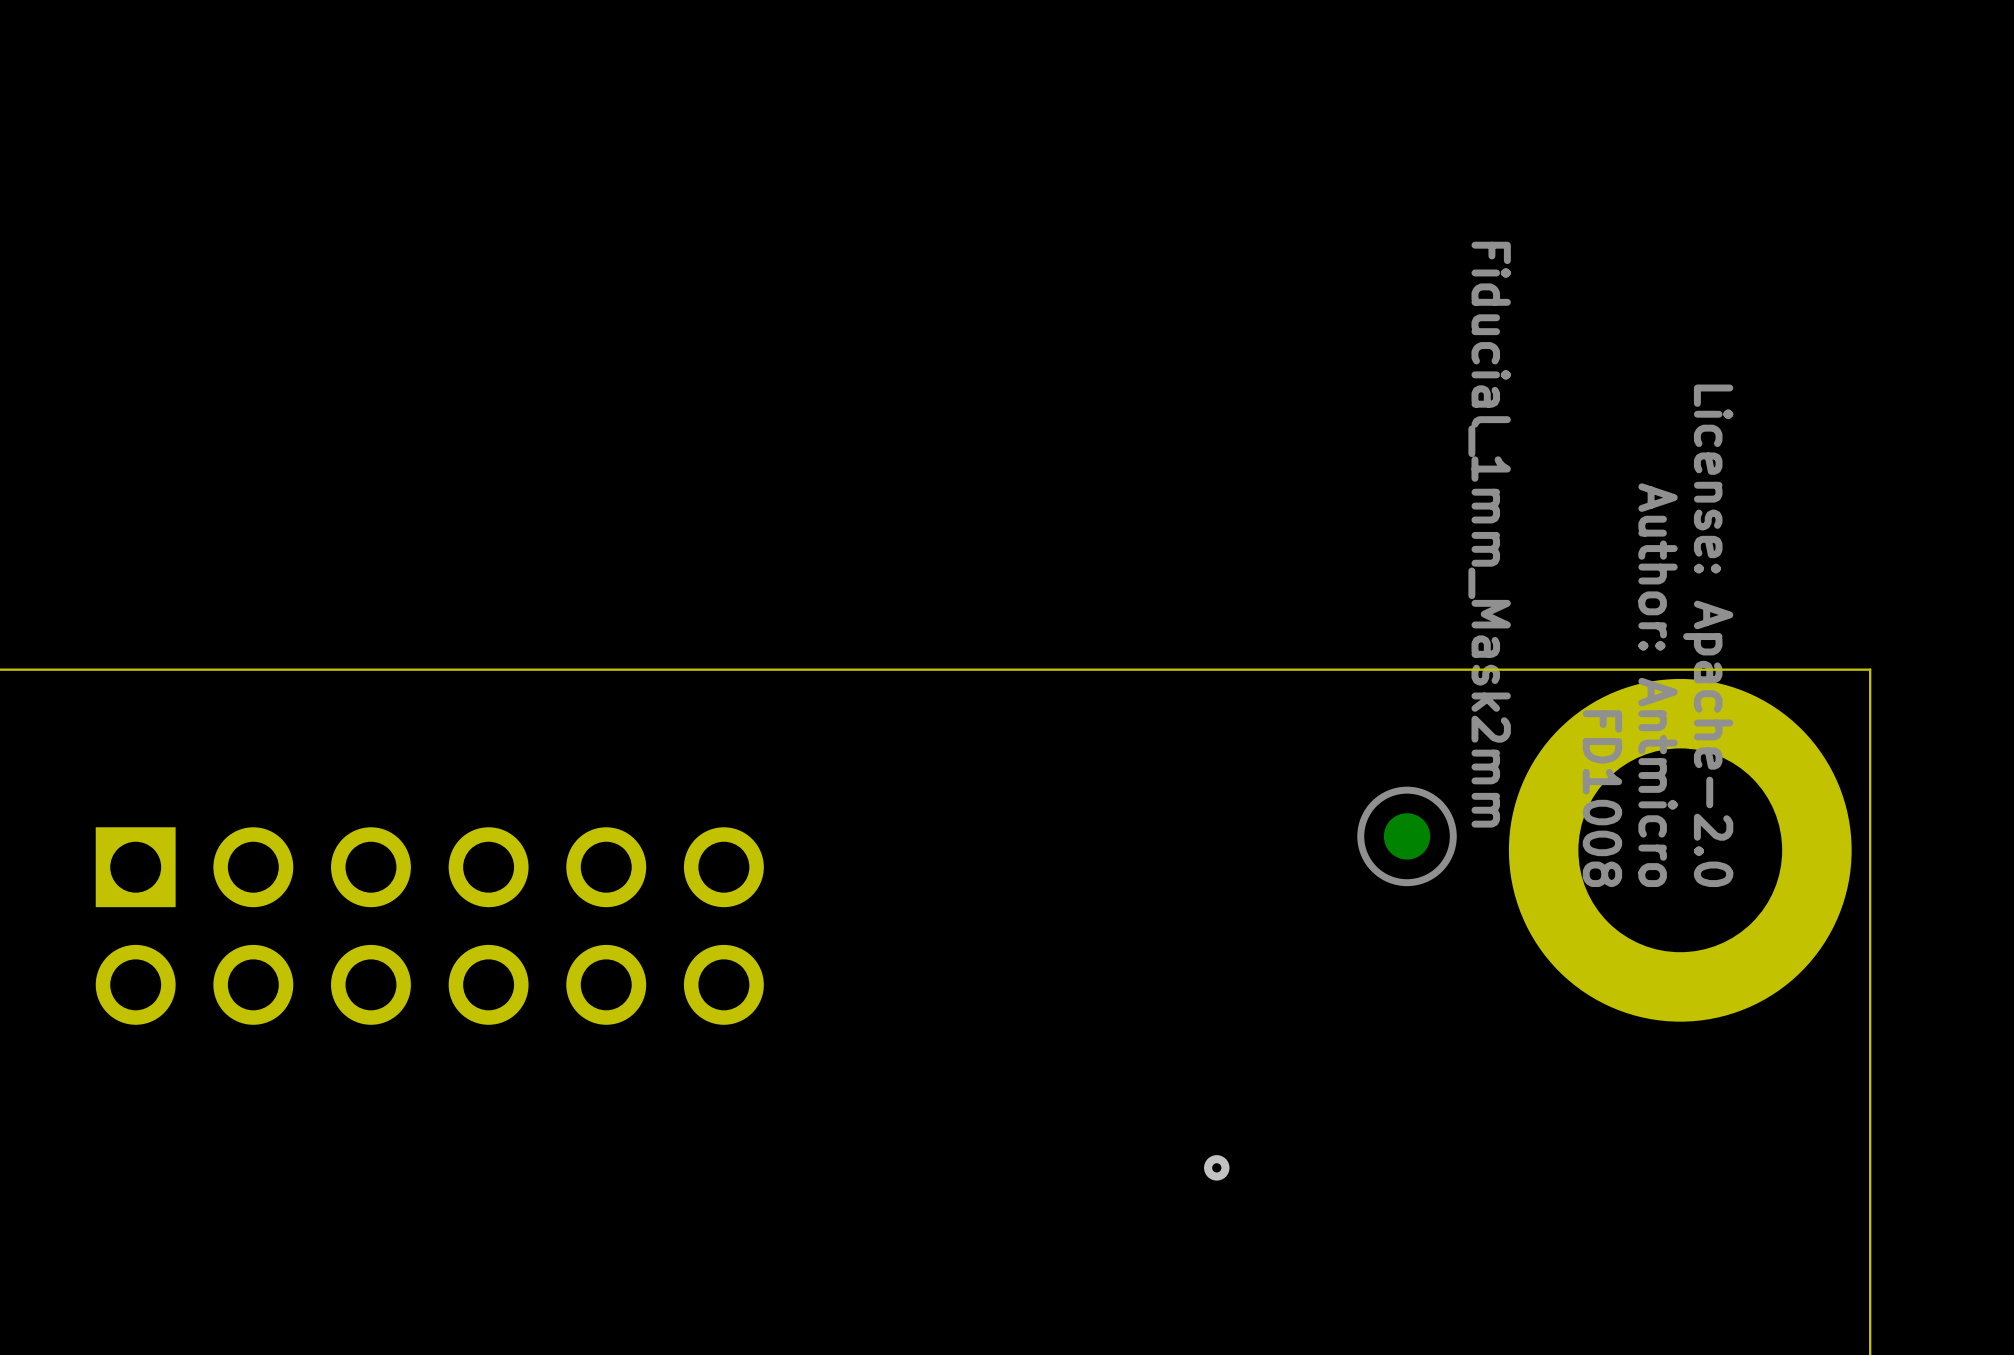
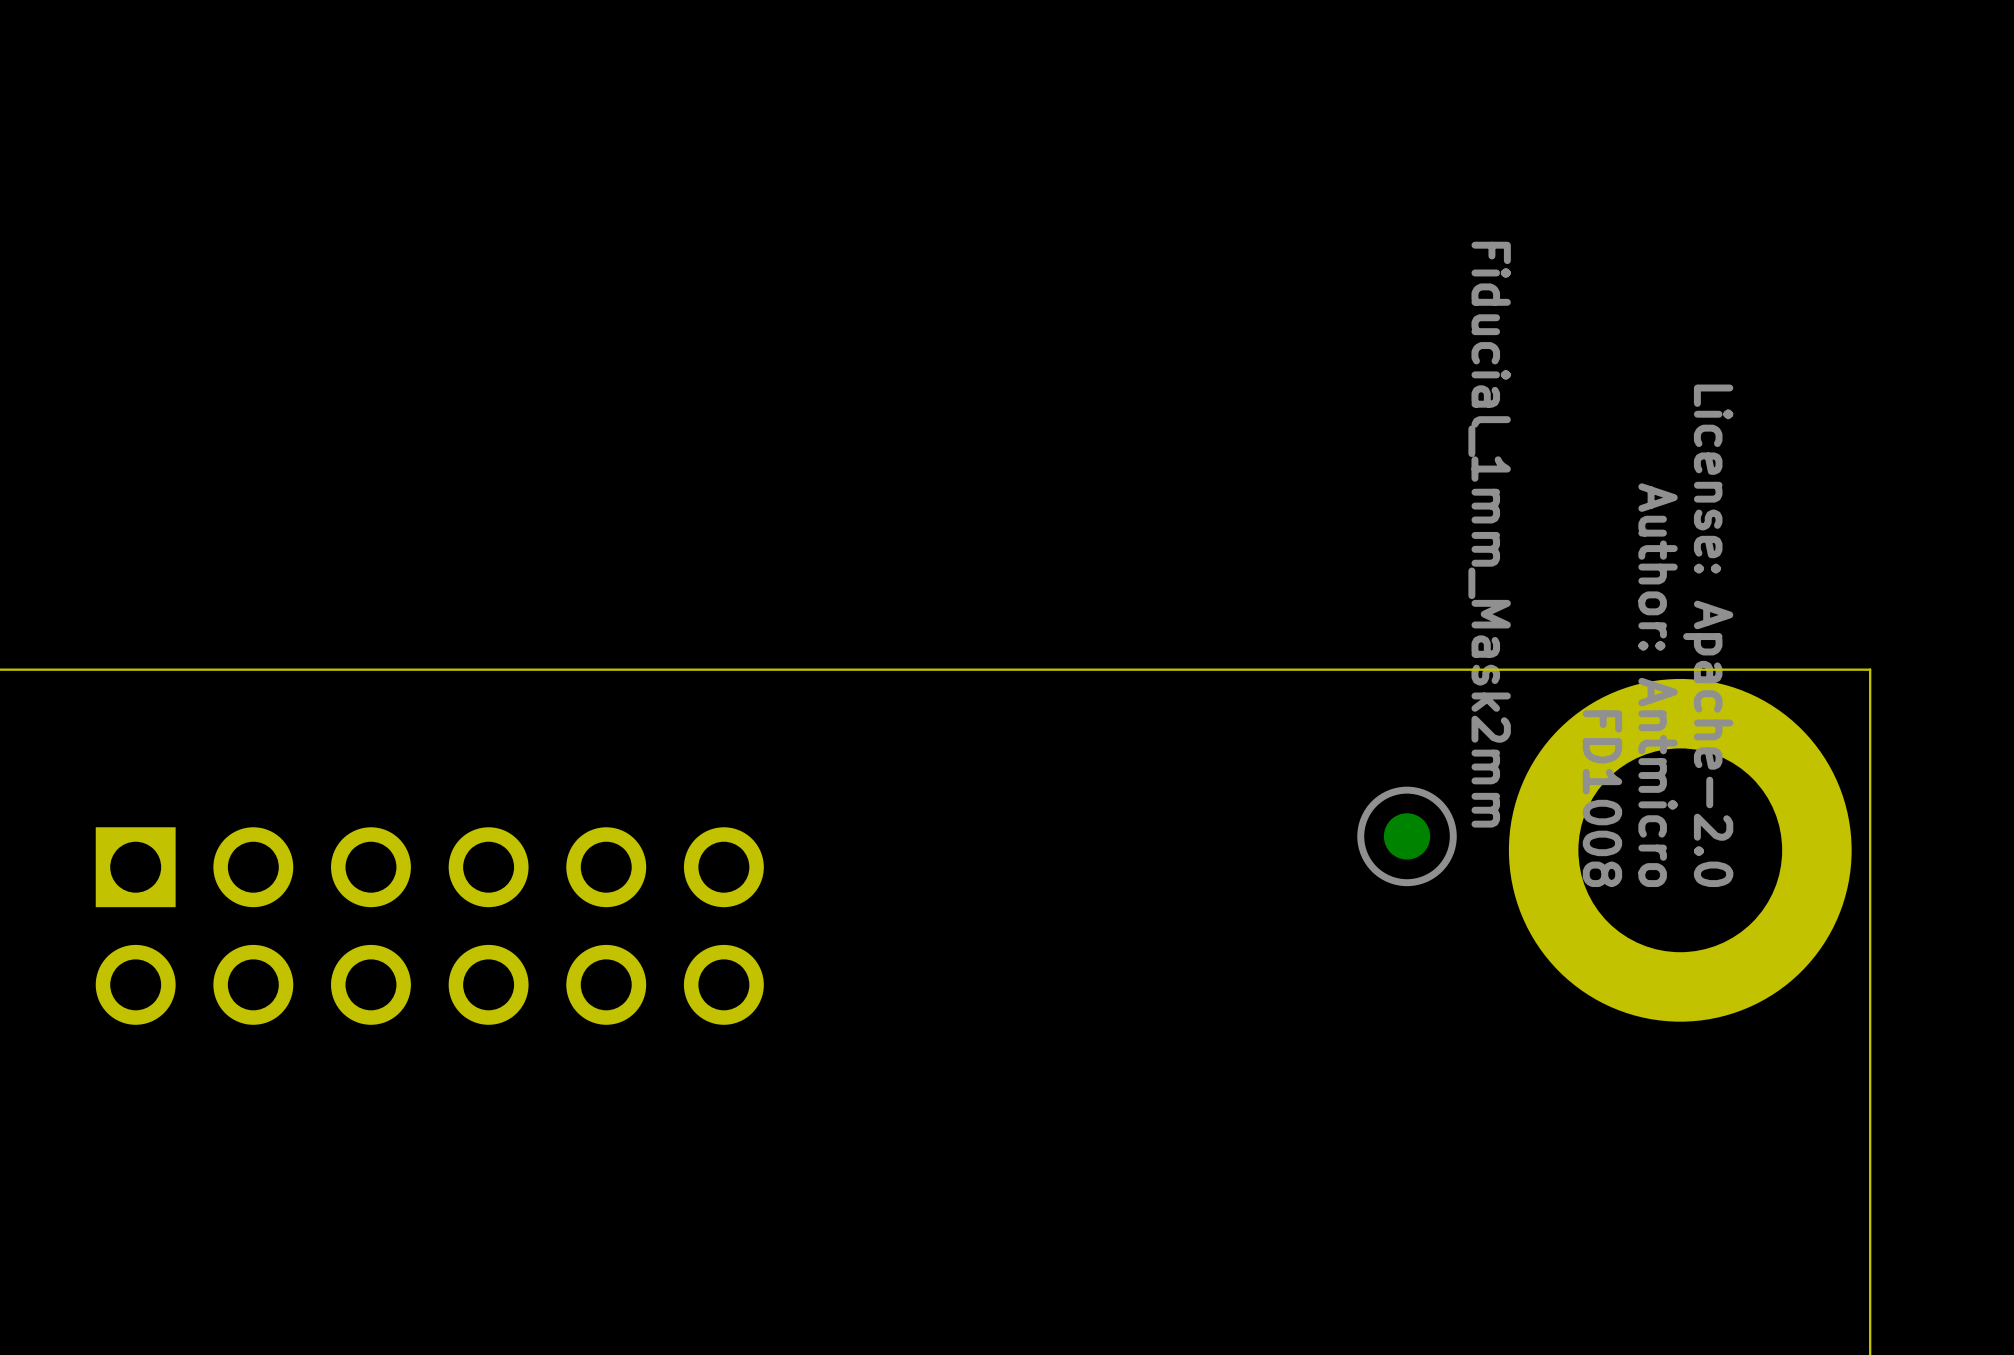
via: (1216, 1167) -> none

